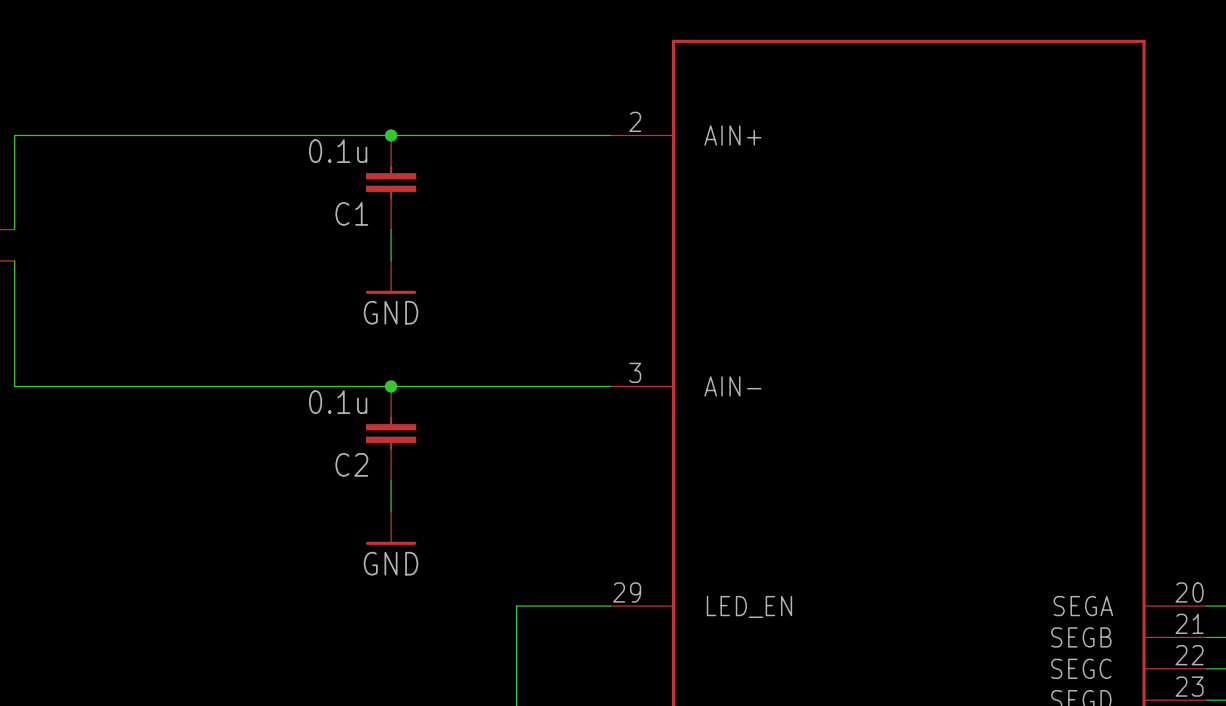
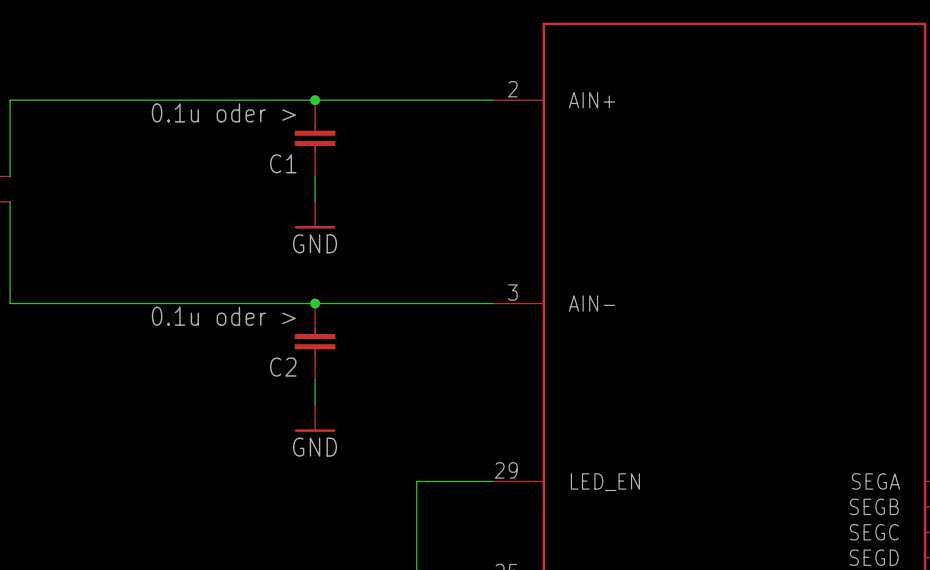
C1 value: 0.1u (338, 151) -> 0.1u oder > (223, 112)
C2 value: 0.1u (338, 402) -> 0.1u oder > (223, 316)

